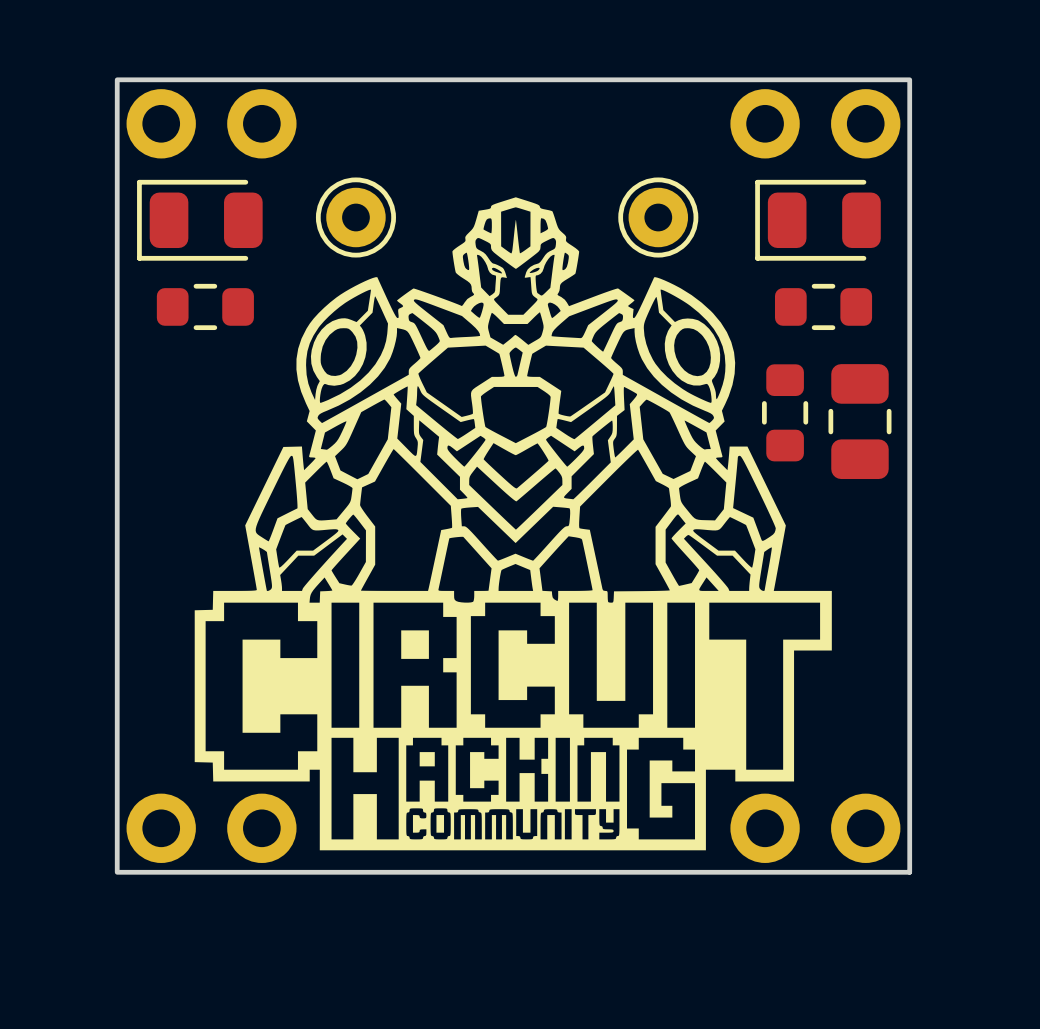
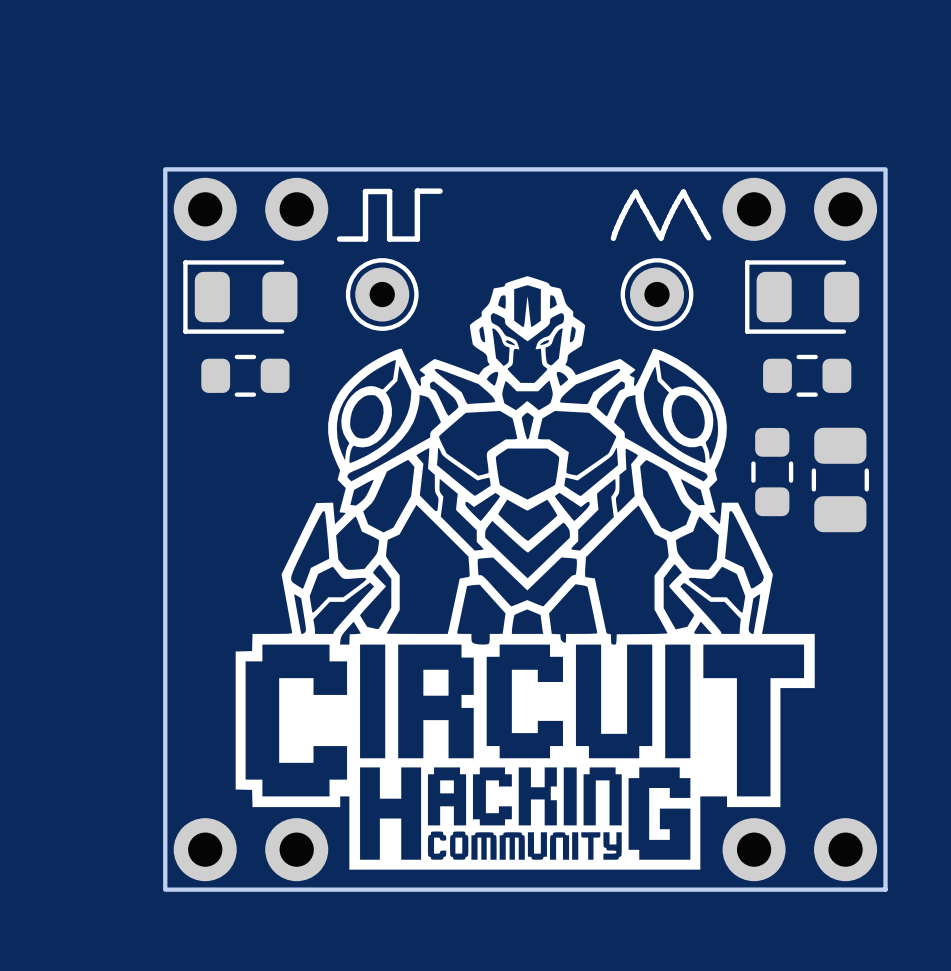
line: none -> (440, 191) (417, 191) (417, 239) (389, 239) (389, 191) (365, 191) (365, 239) (339, 239)
line: none -> (660, 237) (635, 192) (622, 216) (613, 238)
line: none -> (708, 237) (683, 192) (669, 216) (661, 238)

